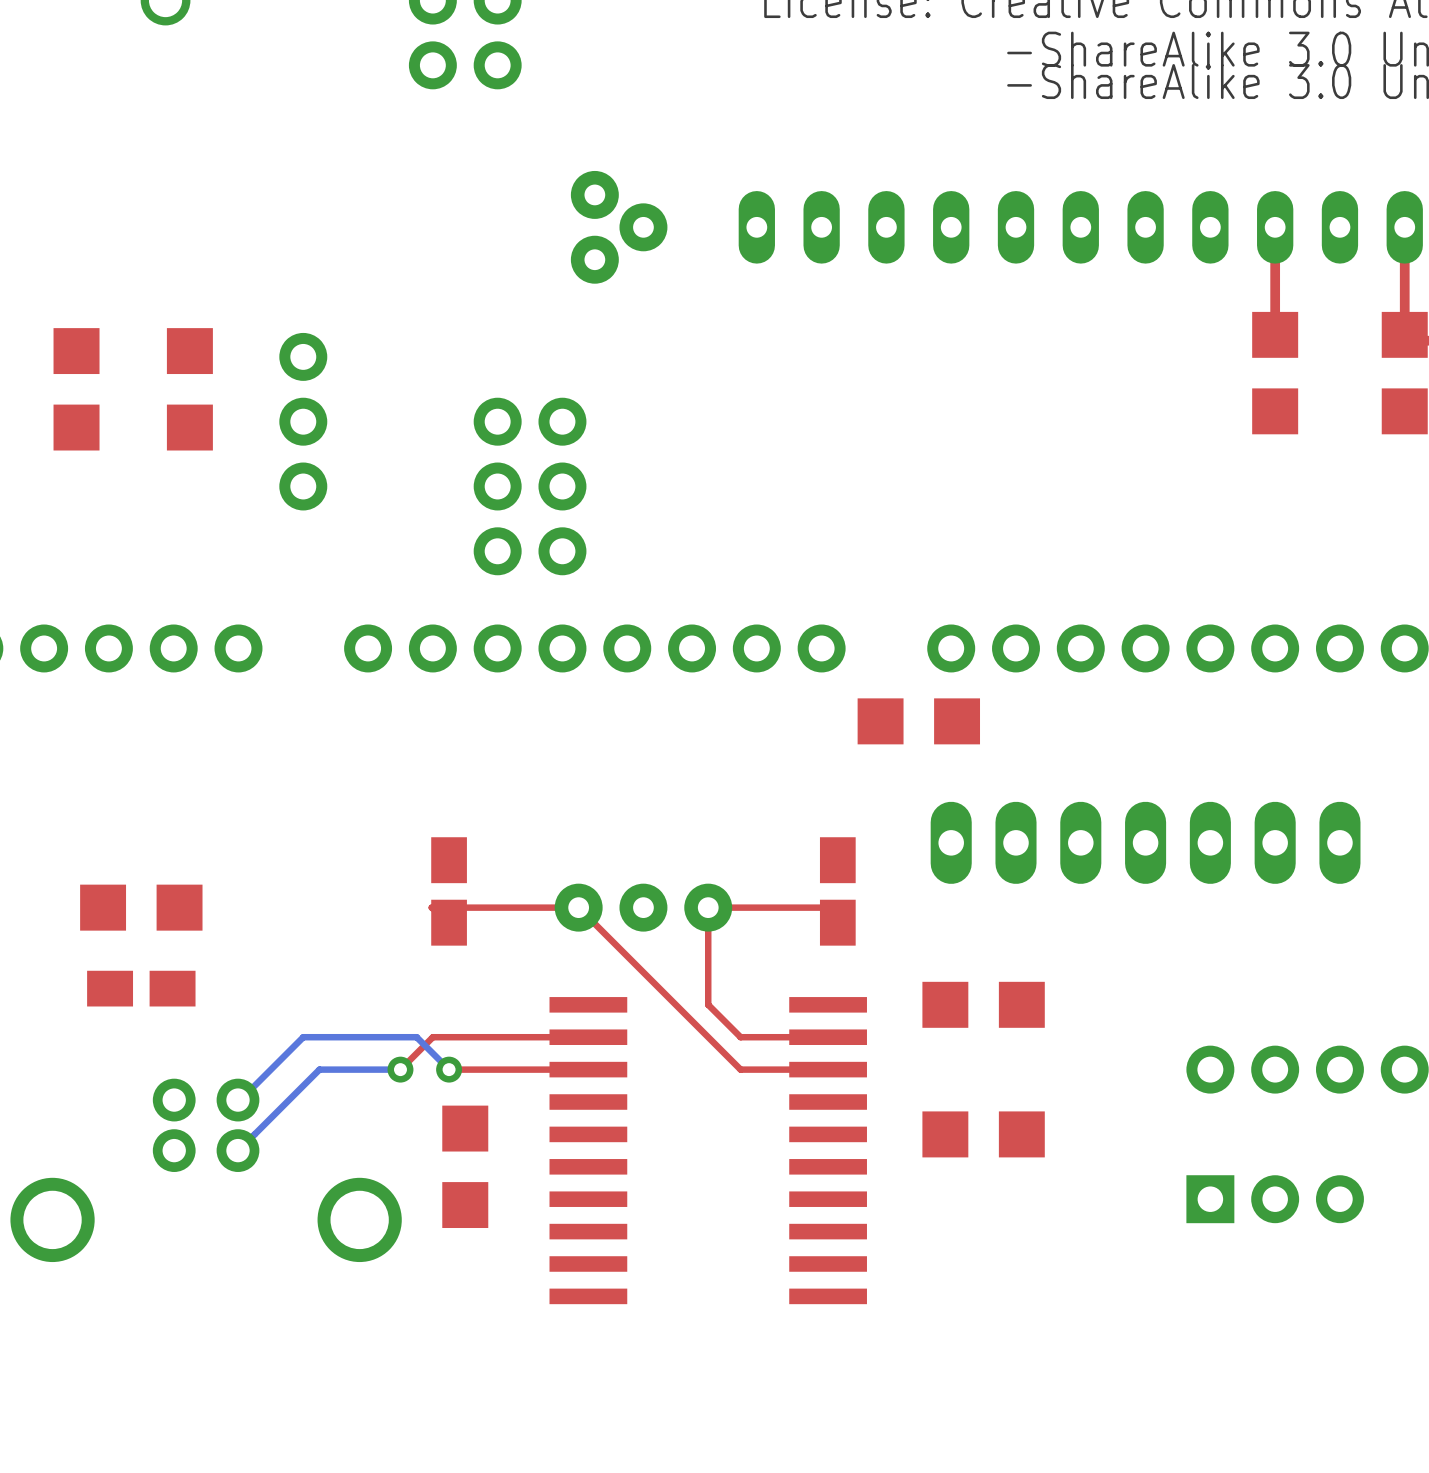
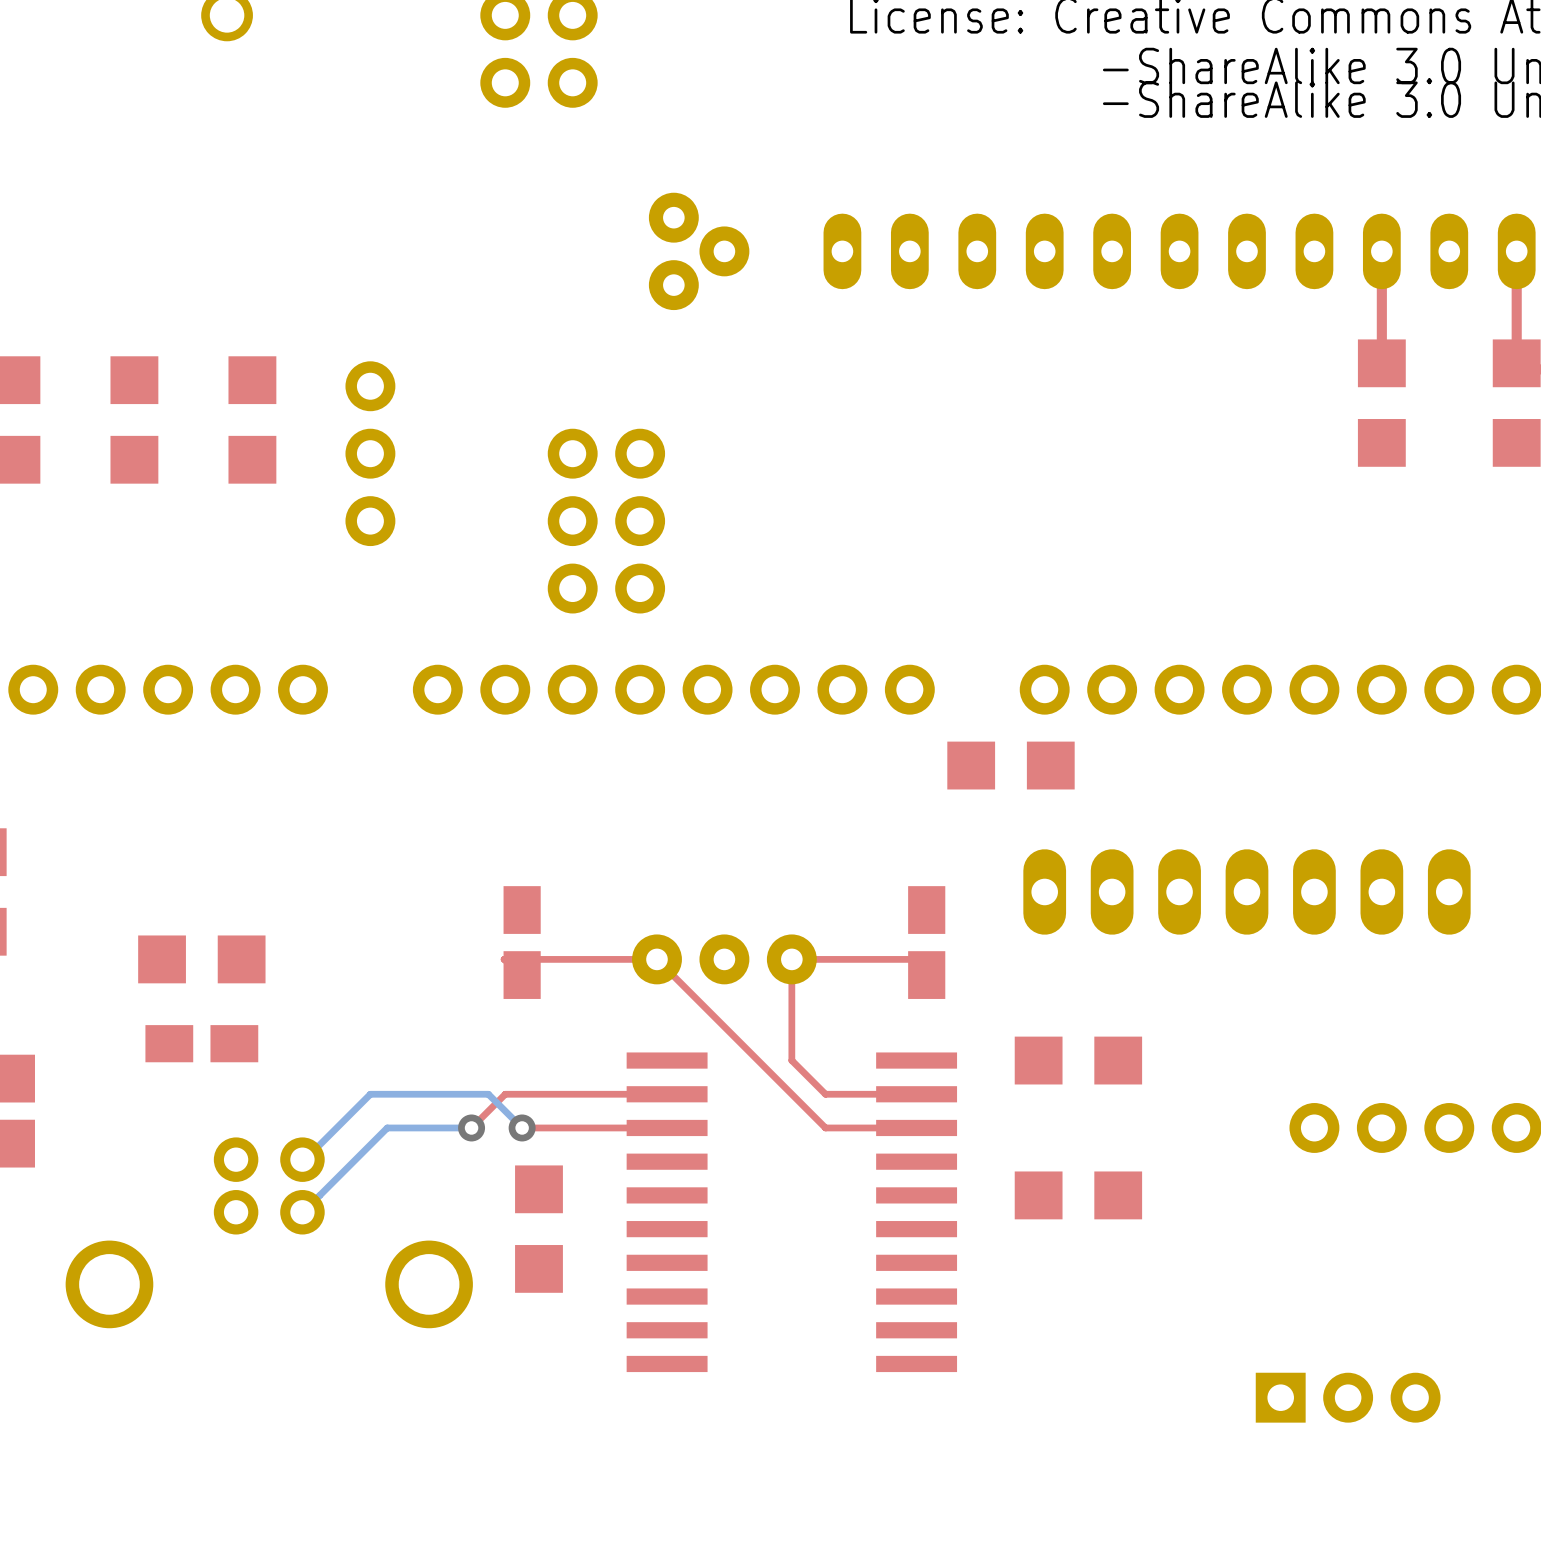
part position: (1275, 1199) -> (1348, 1397)

